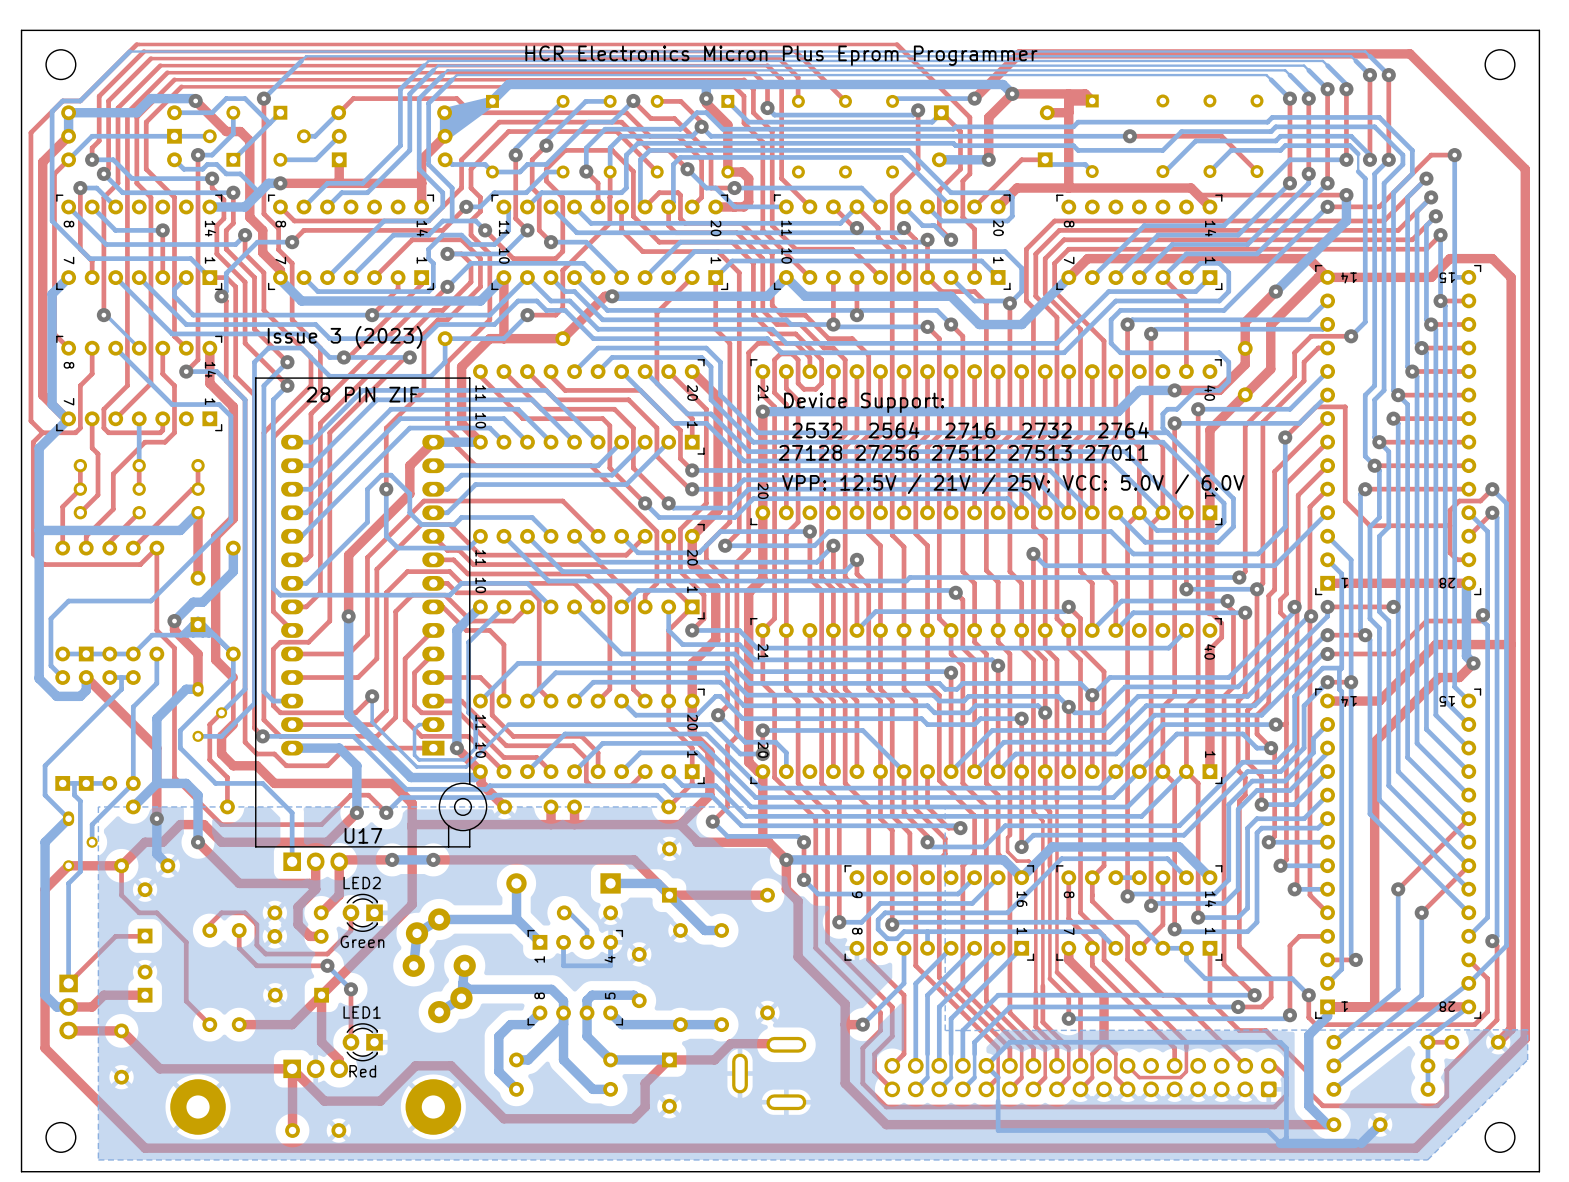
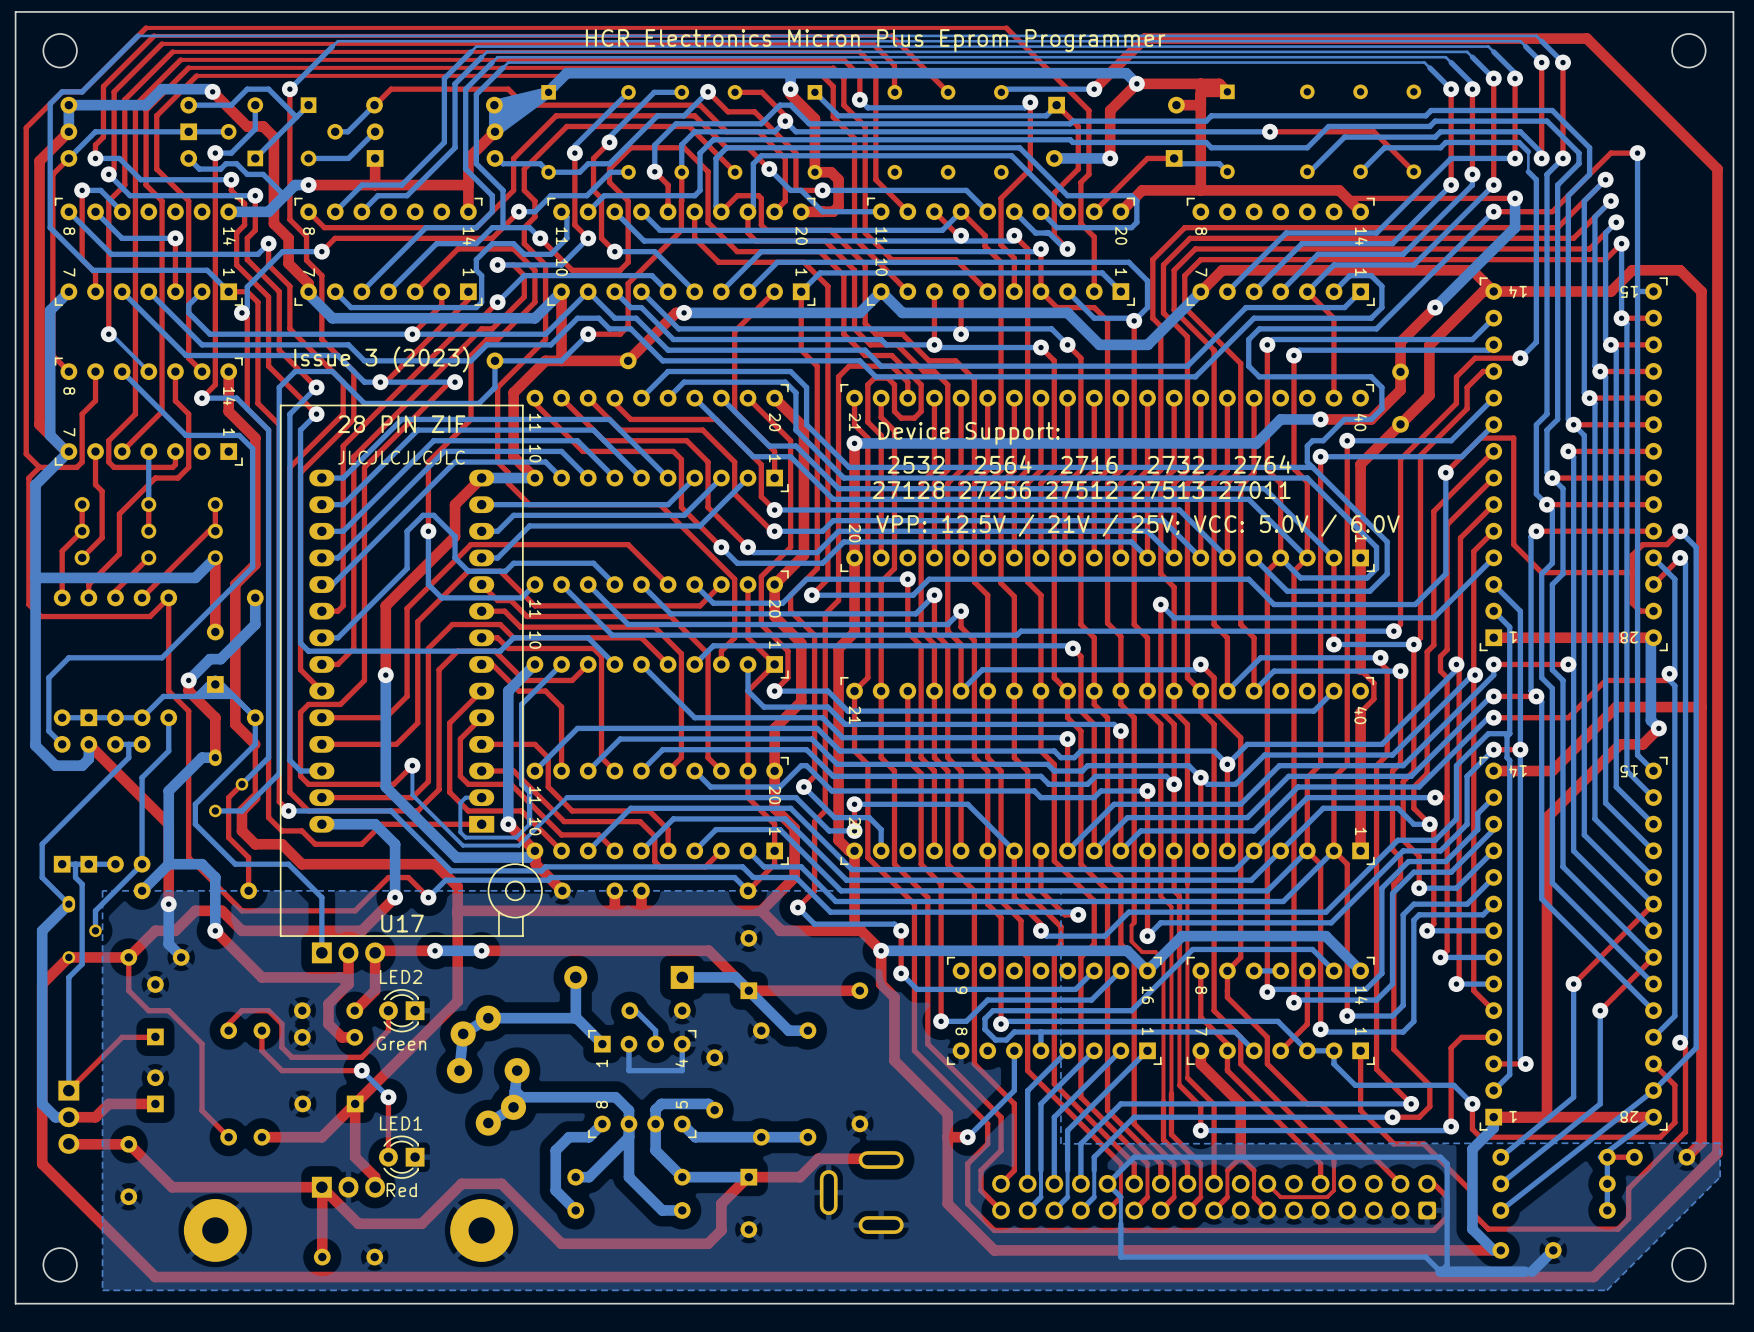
text: none -> JLCJLCJLCJLC (401, 457)

